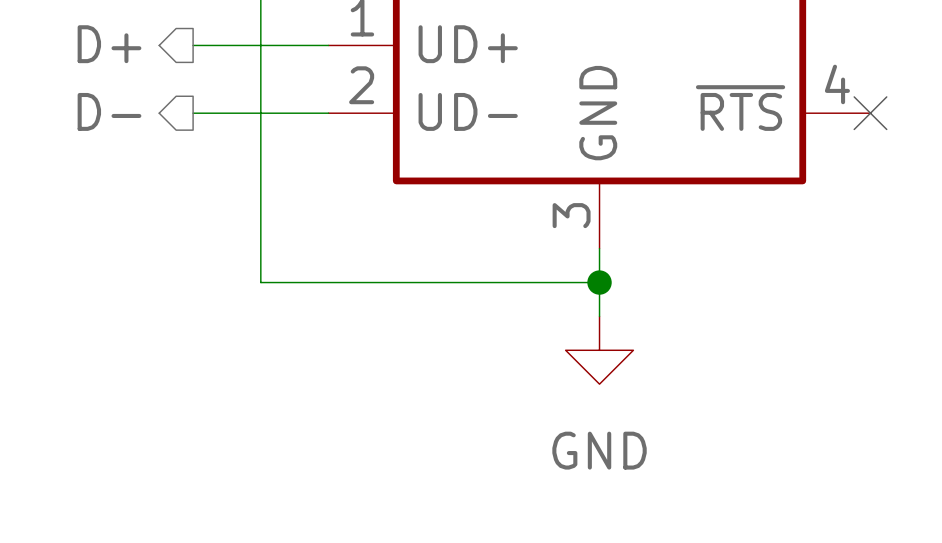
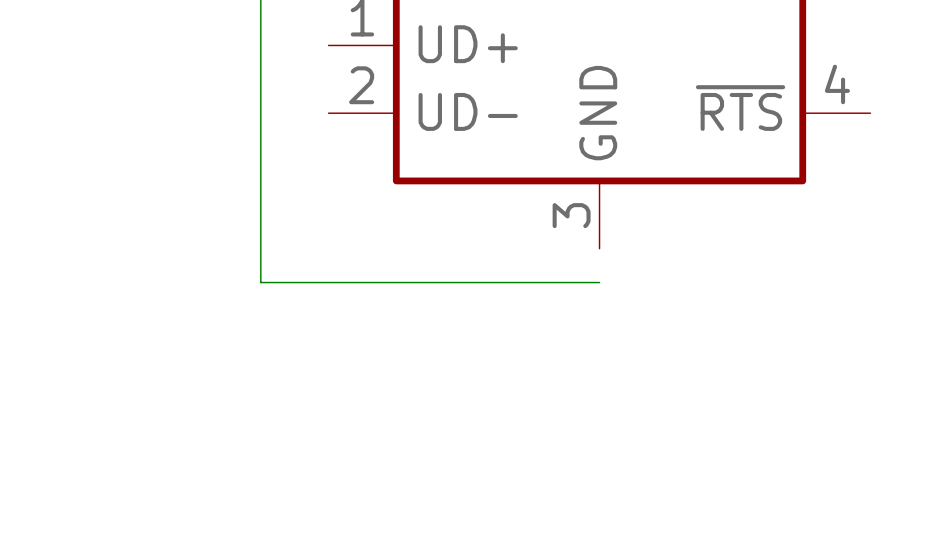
hierarchical label: D+ (109, 44) -> none
wire: (193, 45) (328, 45) -> none
hierarchical label: D- (109, 111) -> none
wire: (193, 113) (328, 113) -> none
no-connect mark: (870, 113) -> none
wire: (599, 248) (599, 316) -> none
junction: (599, 282) -> none
power symbol: GND (599, 350) -> none

